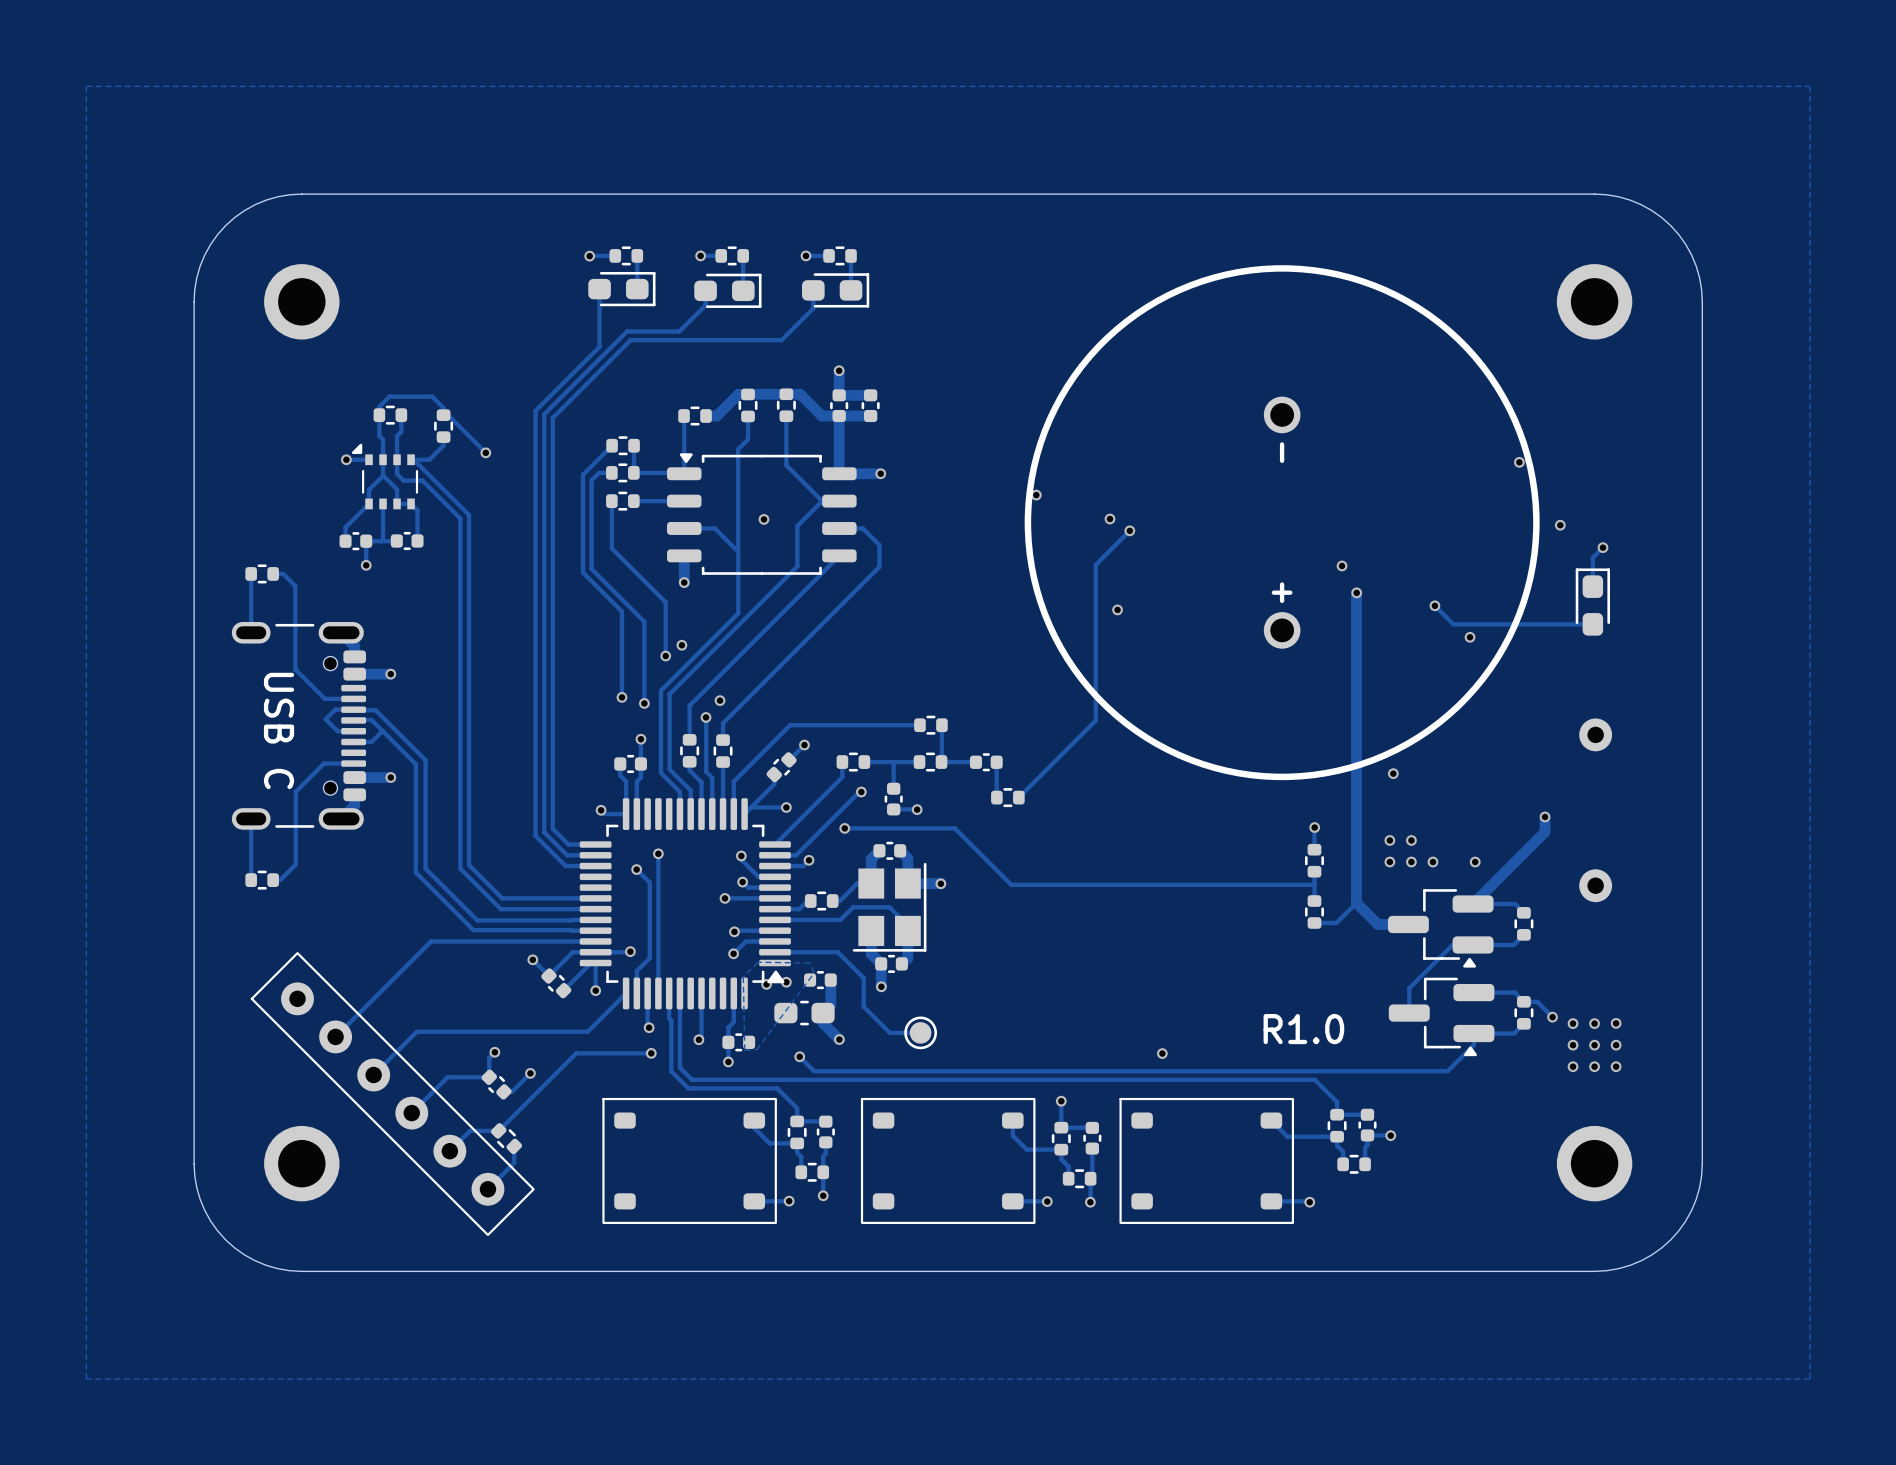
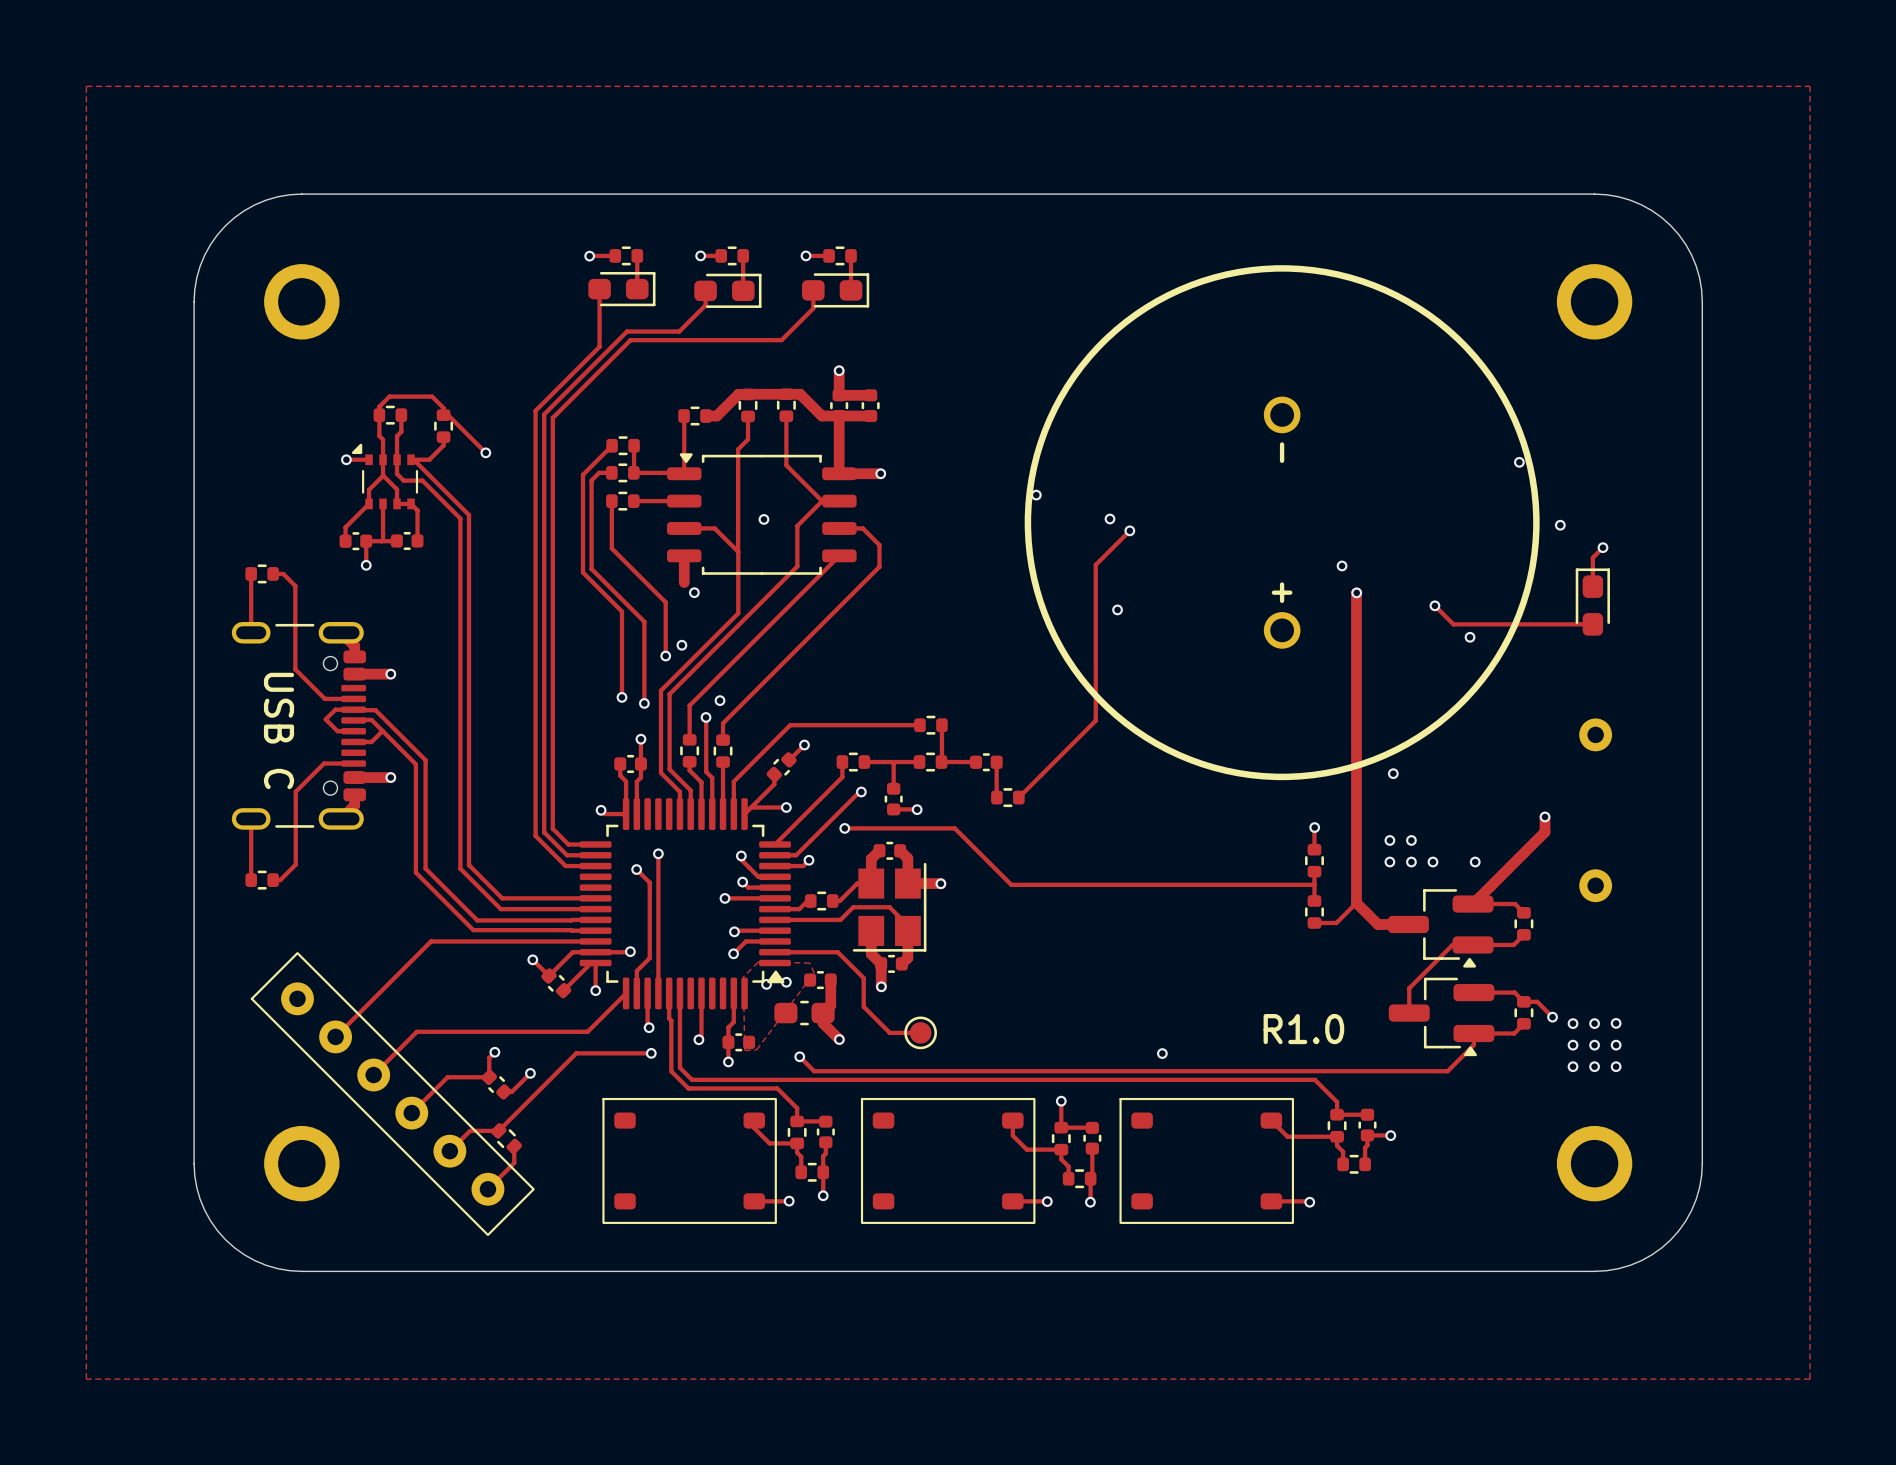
via position: (684, 582) -> (694, 592)

